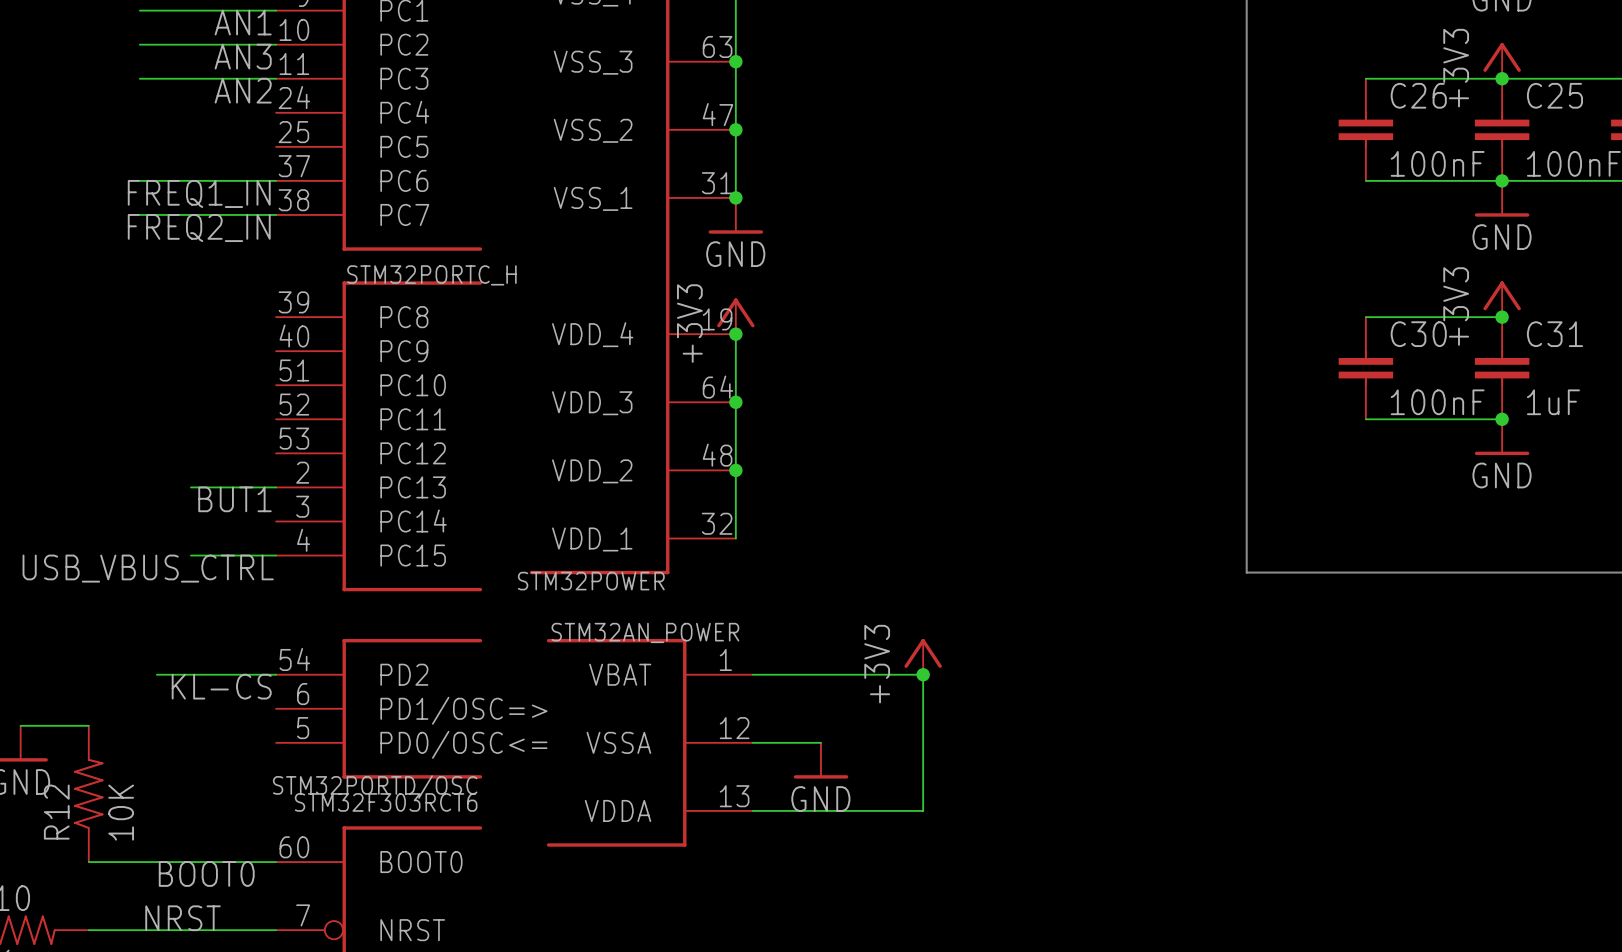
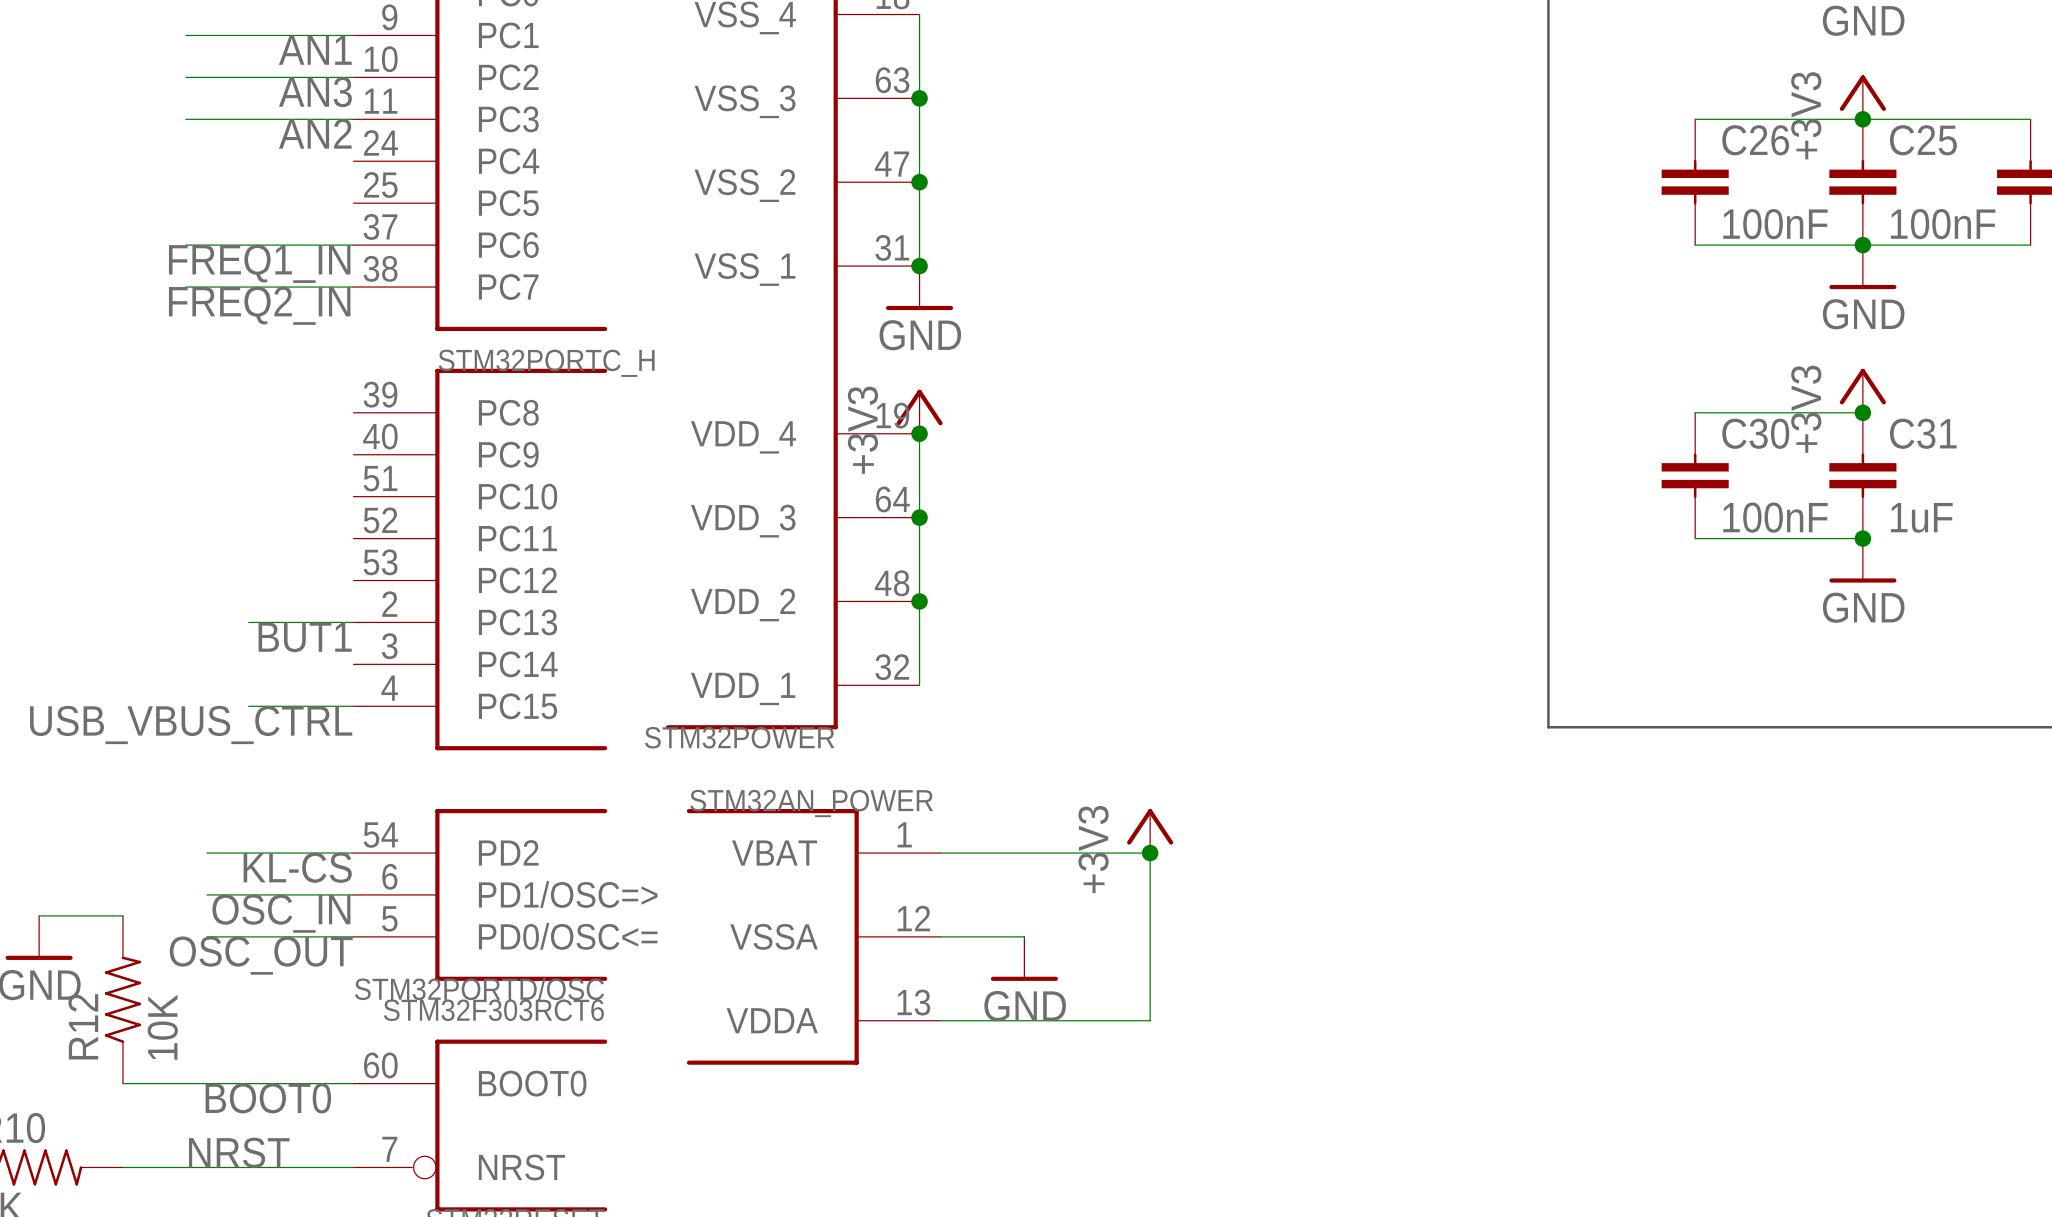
wire: none -> (206, 894) (353, 894)
label: none -> OSC_IN (281, 913)
wire: none -> (206, 936) (353, 936)
label: none -> OSC_OUT (261, 955)

